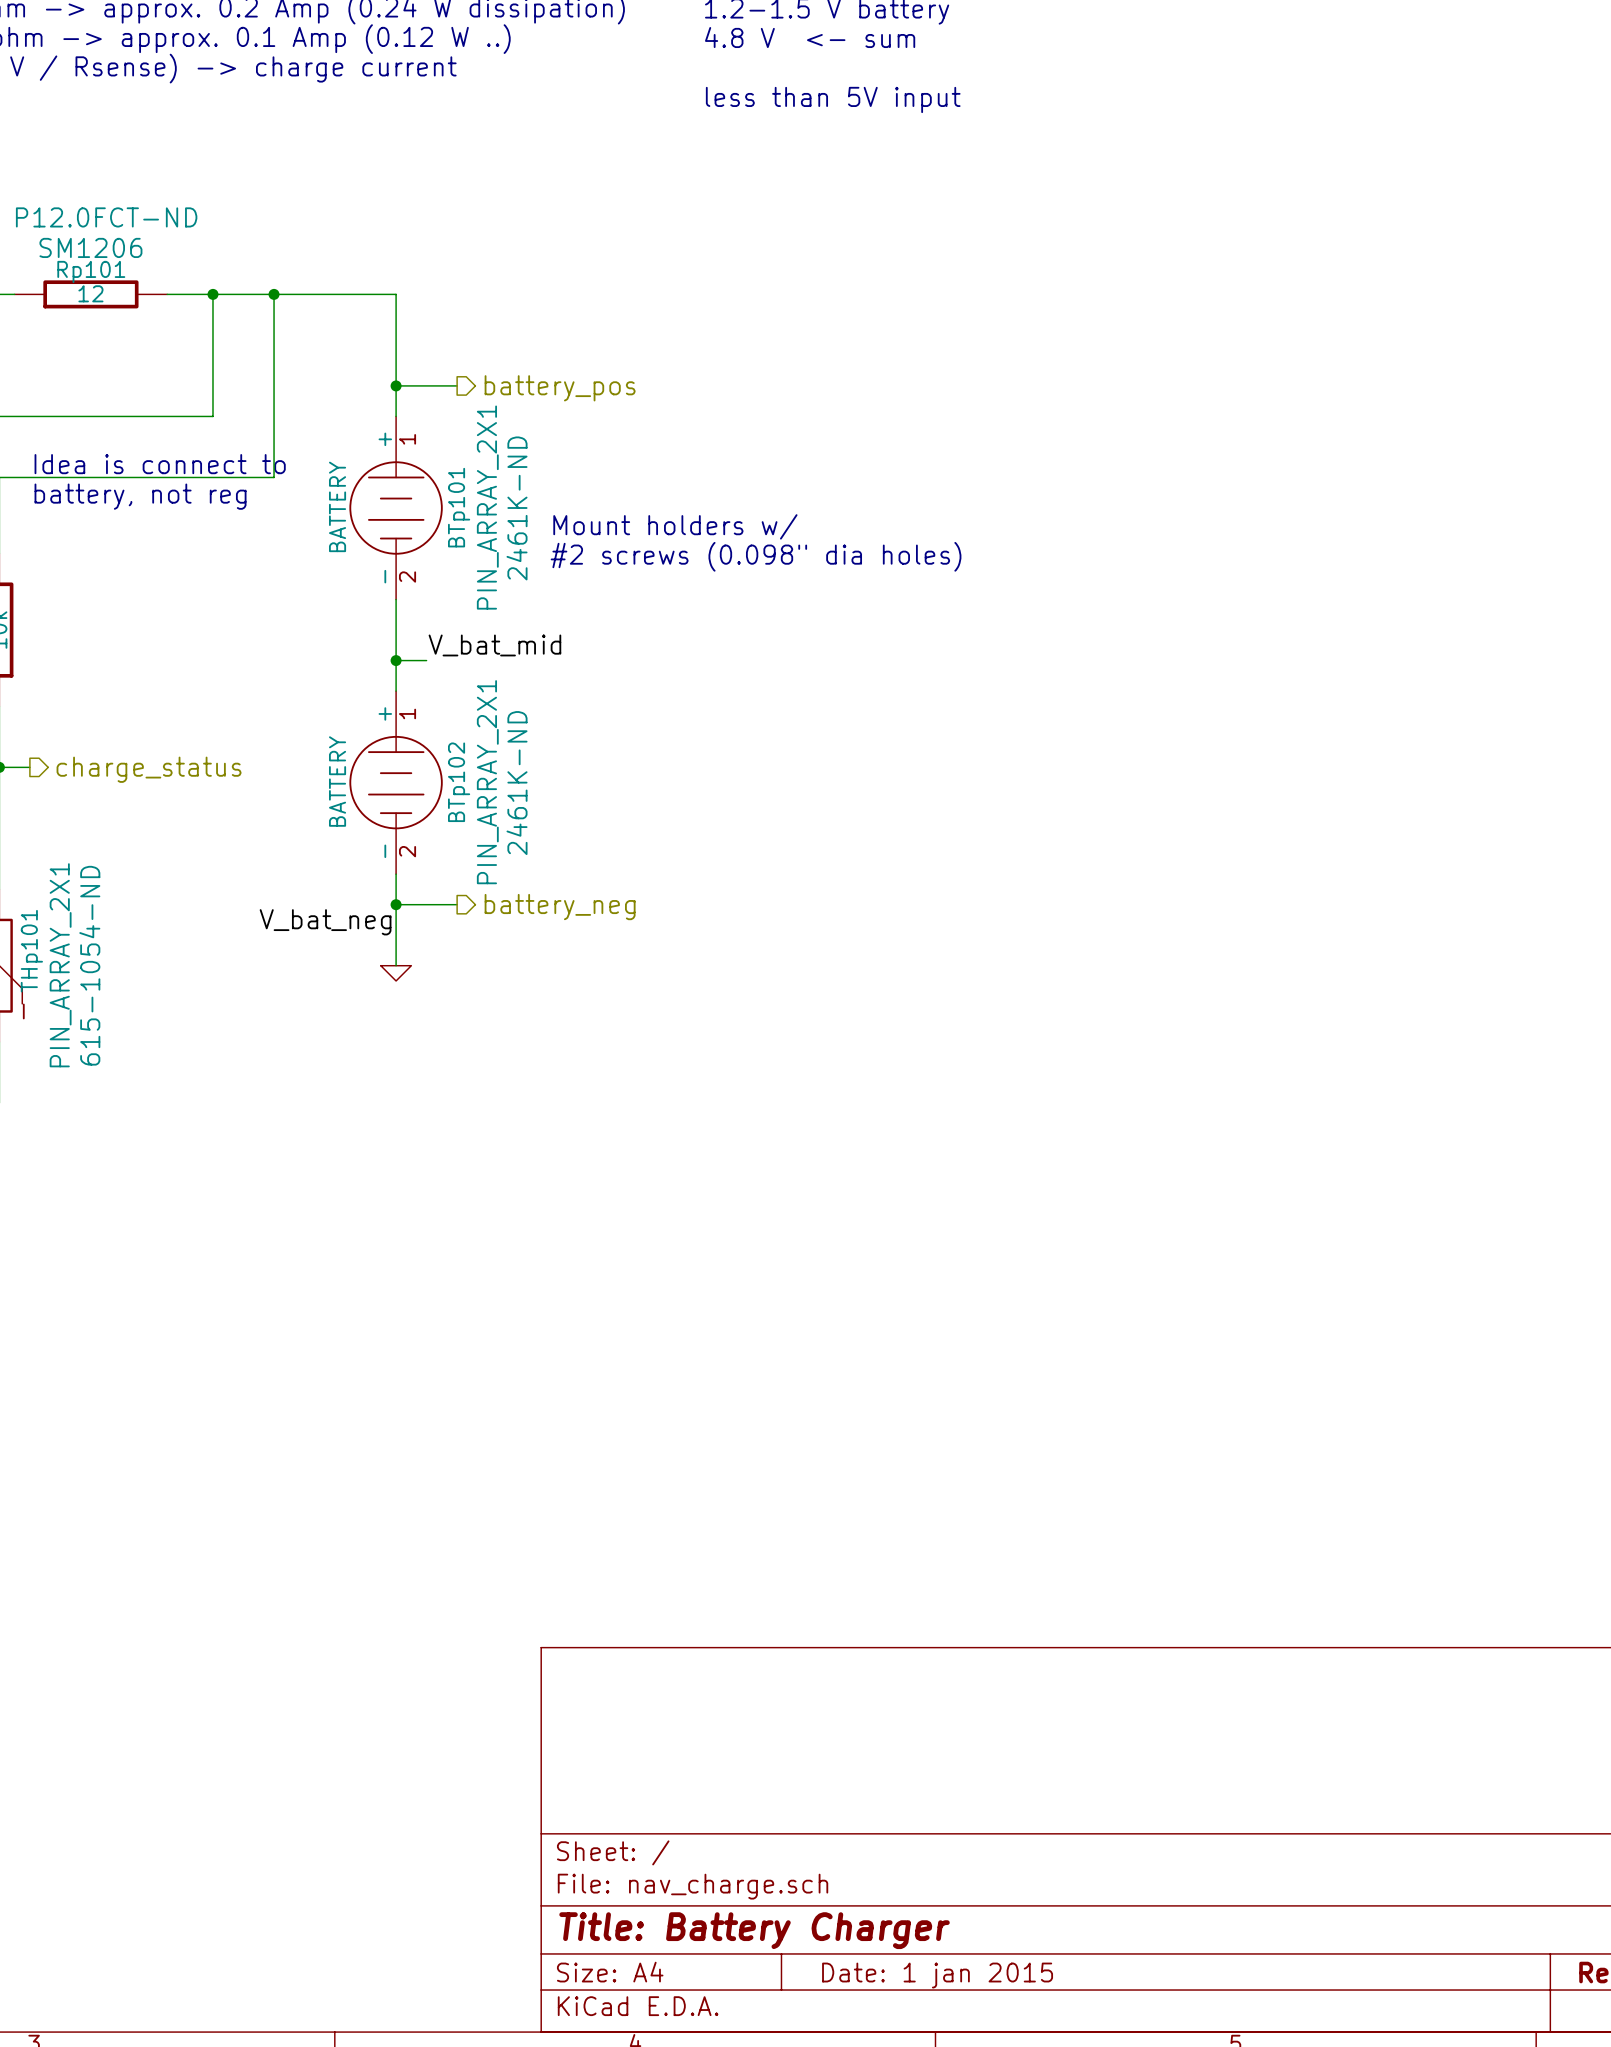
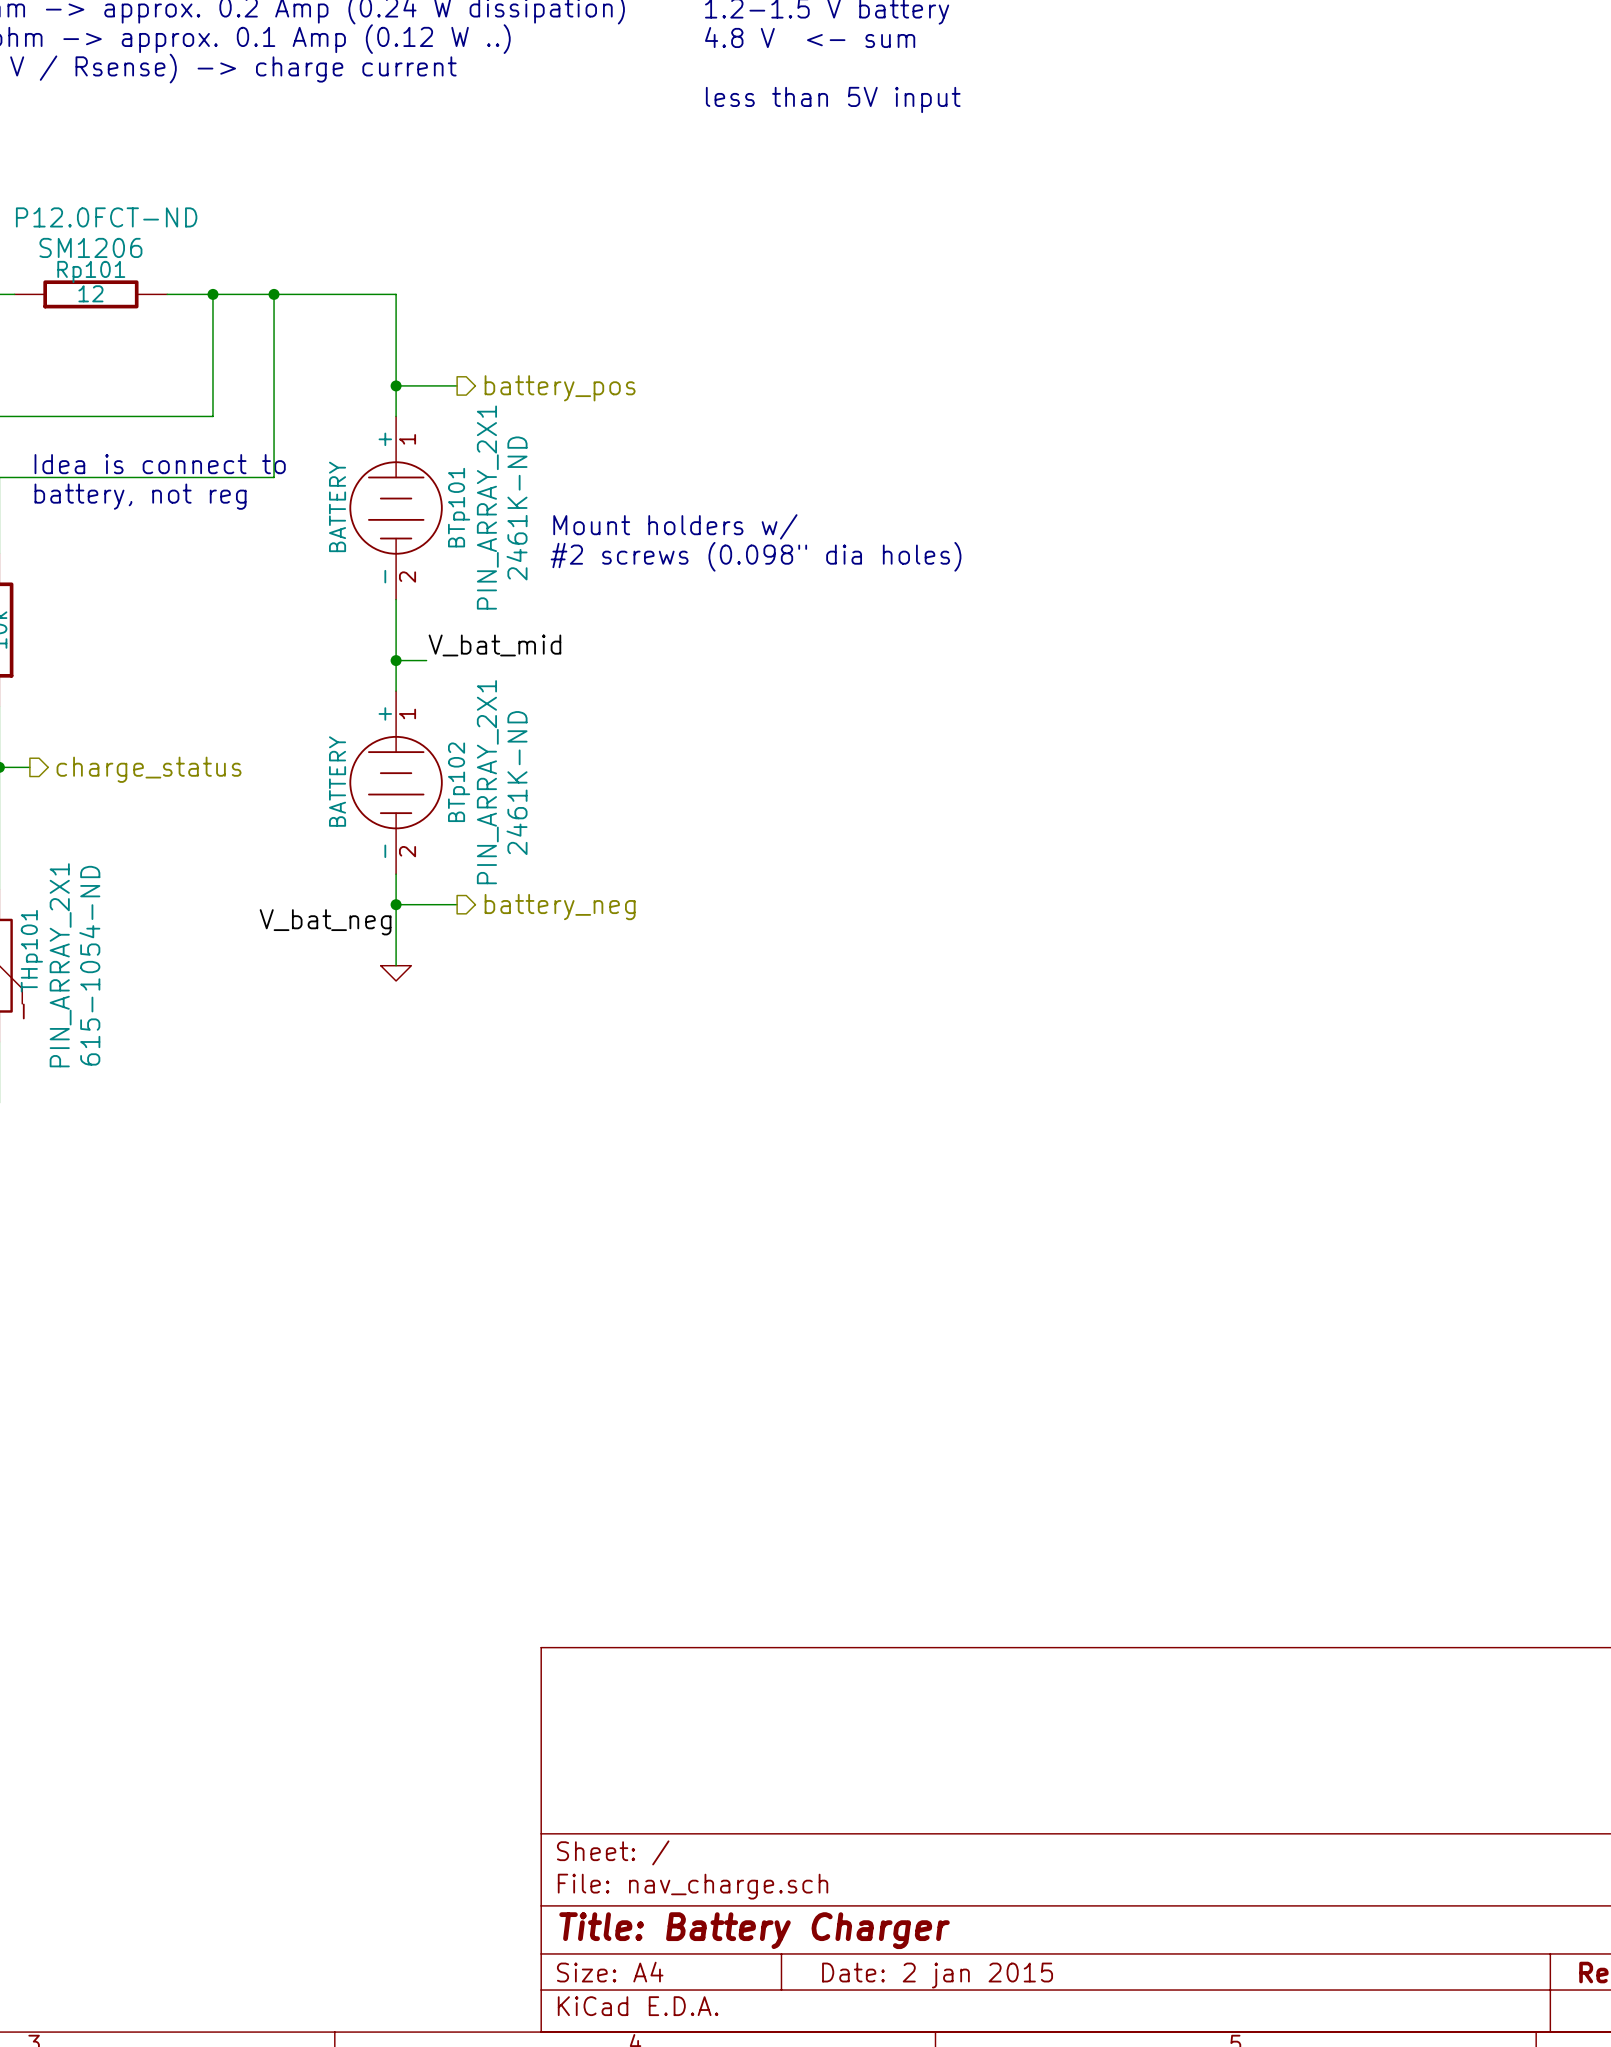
title block: Date: 1 jan 2015 (937, 1975) -> Date: 2 jan 2015 (937, 1975)

